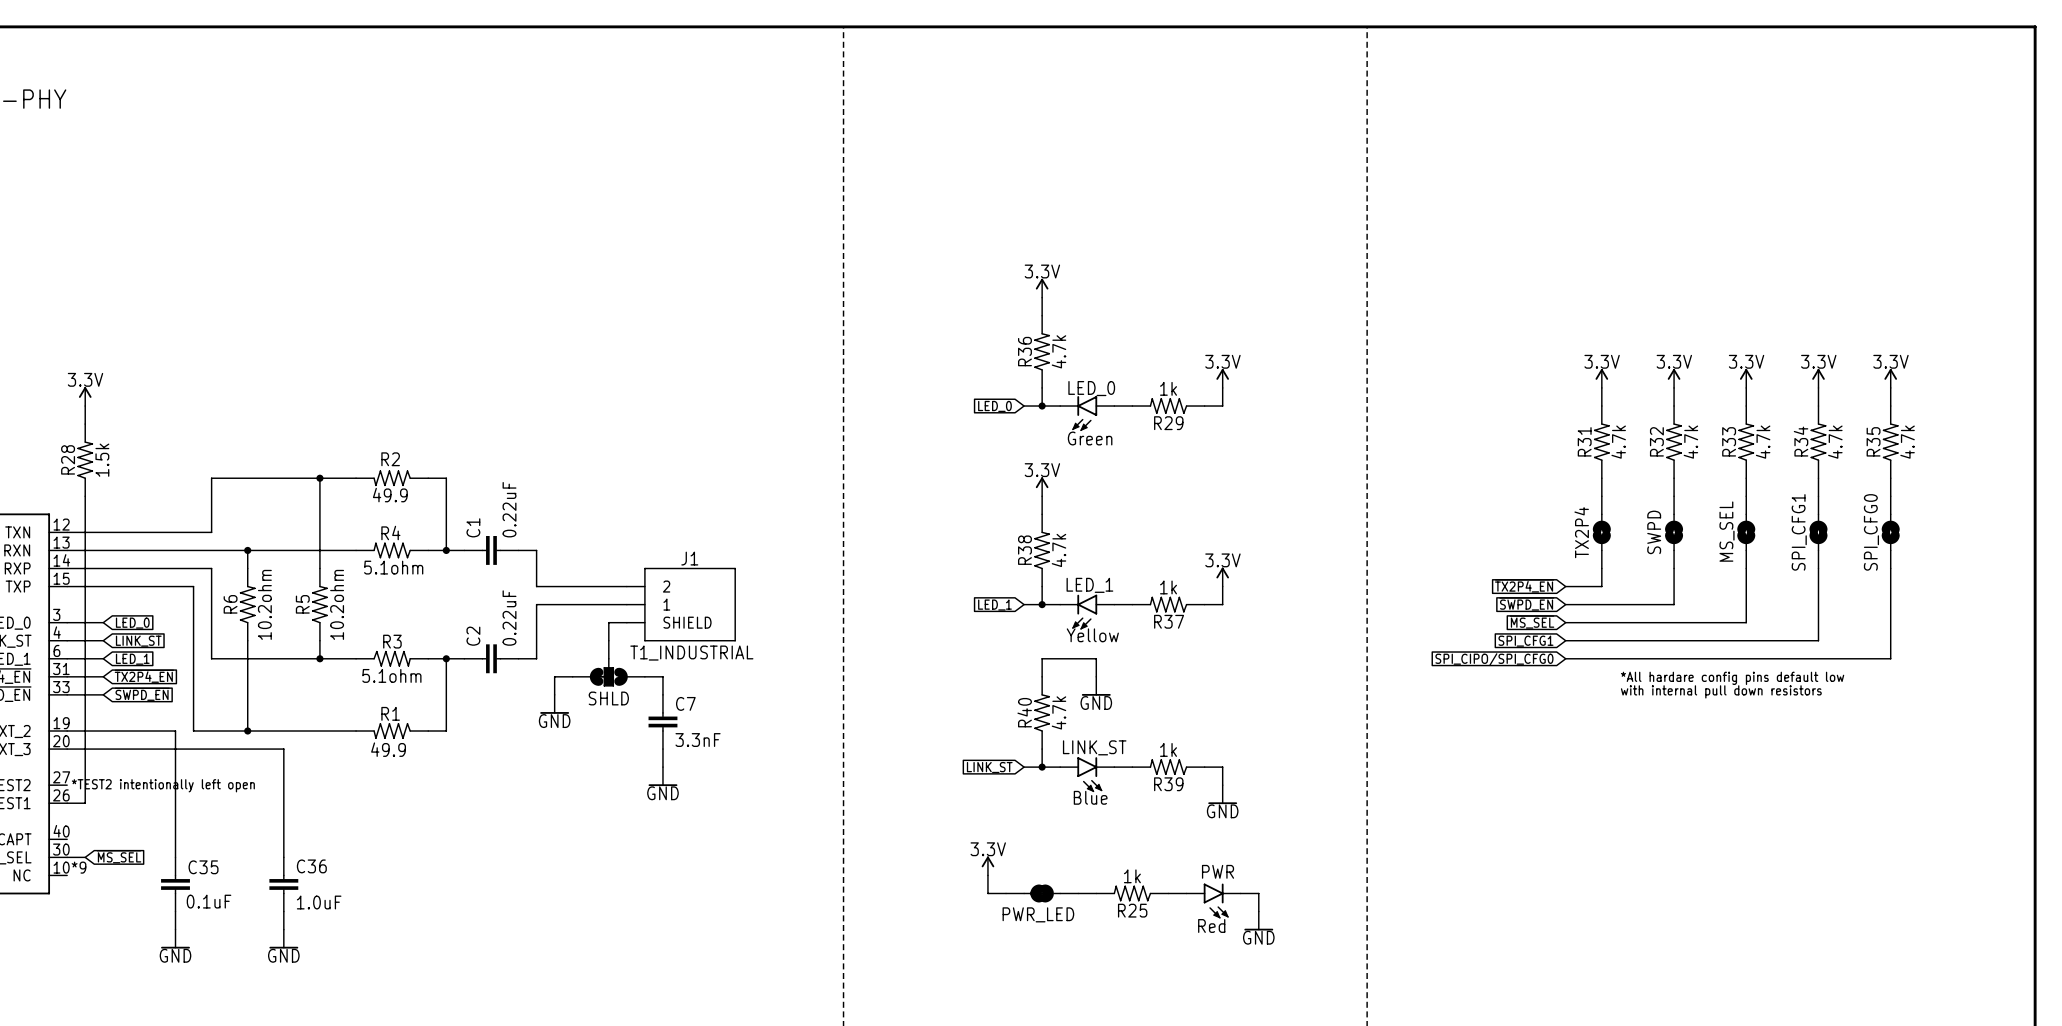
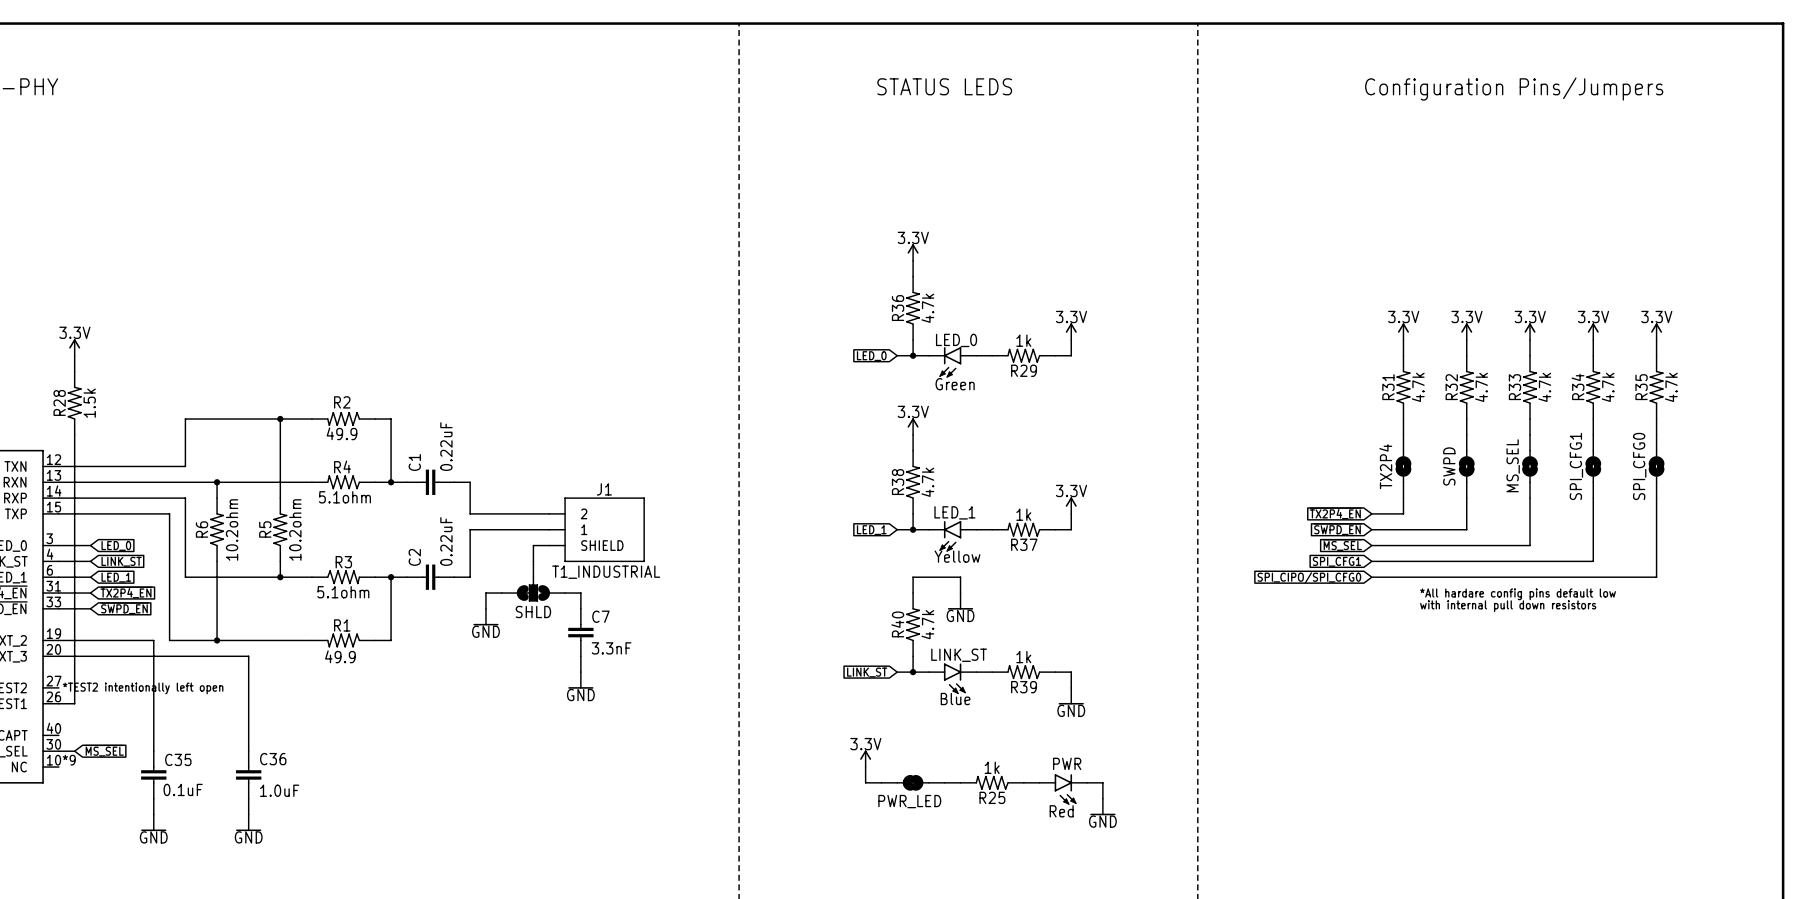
text: none -> STATUS LEDS (944, 86)
text: none -> Configuration Pins/Jumpers (1514, 89)

